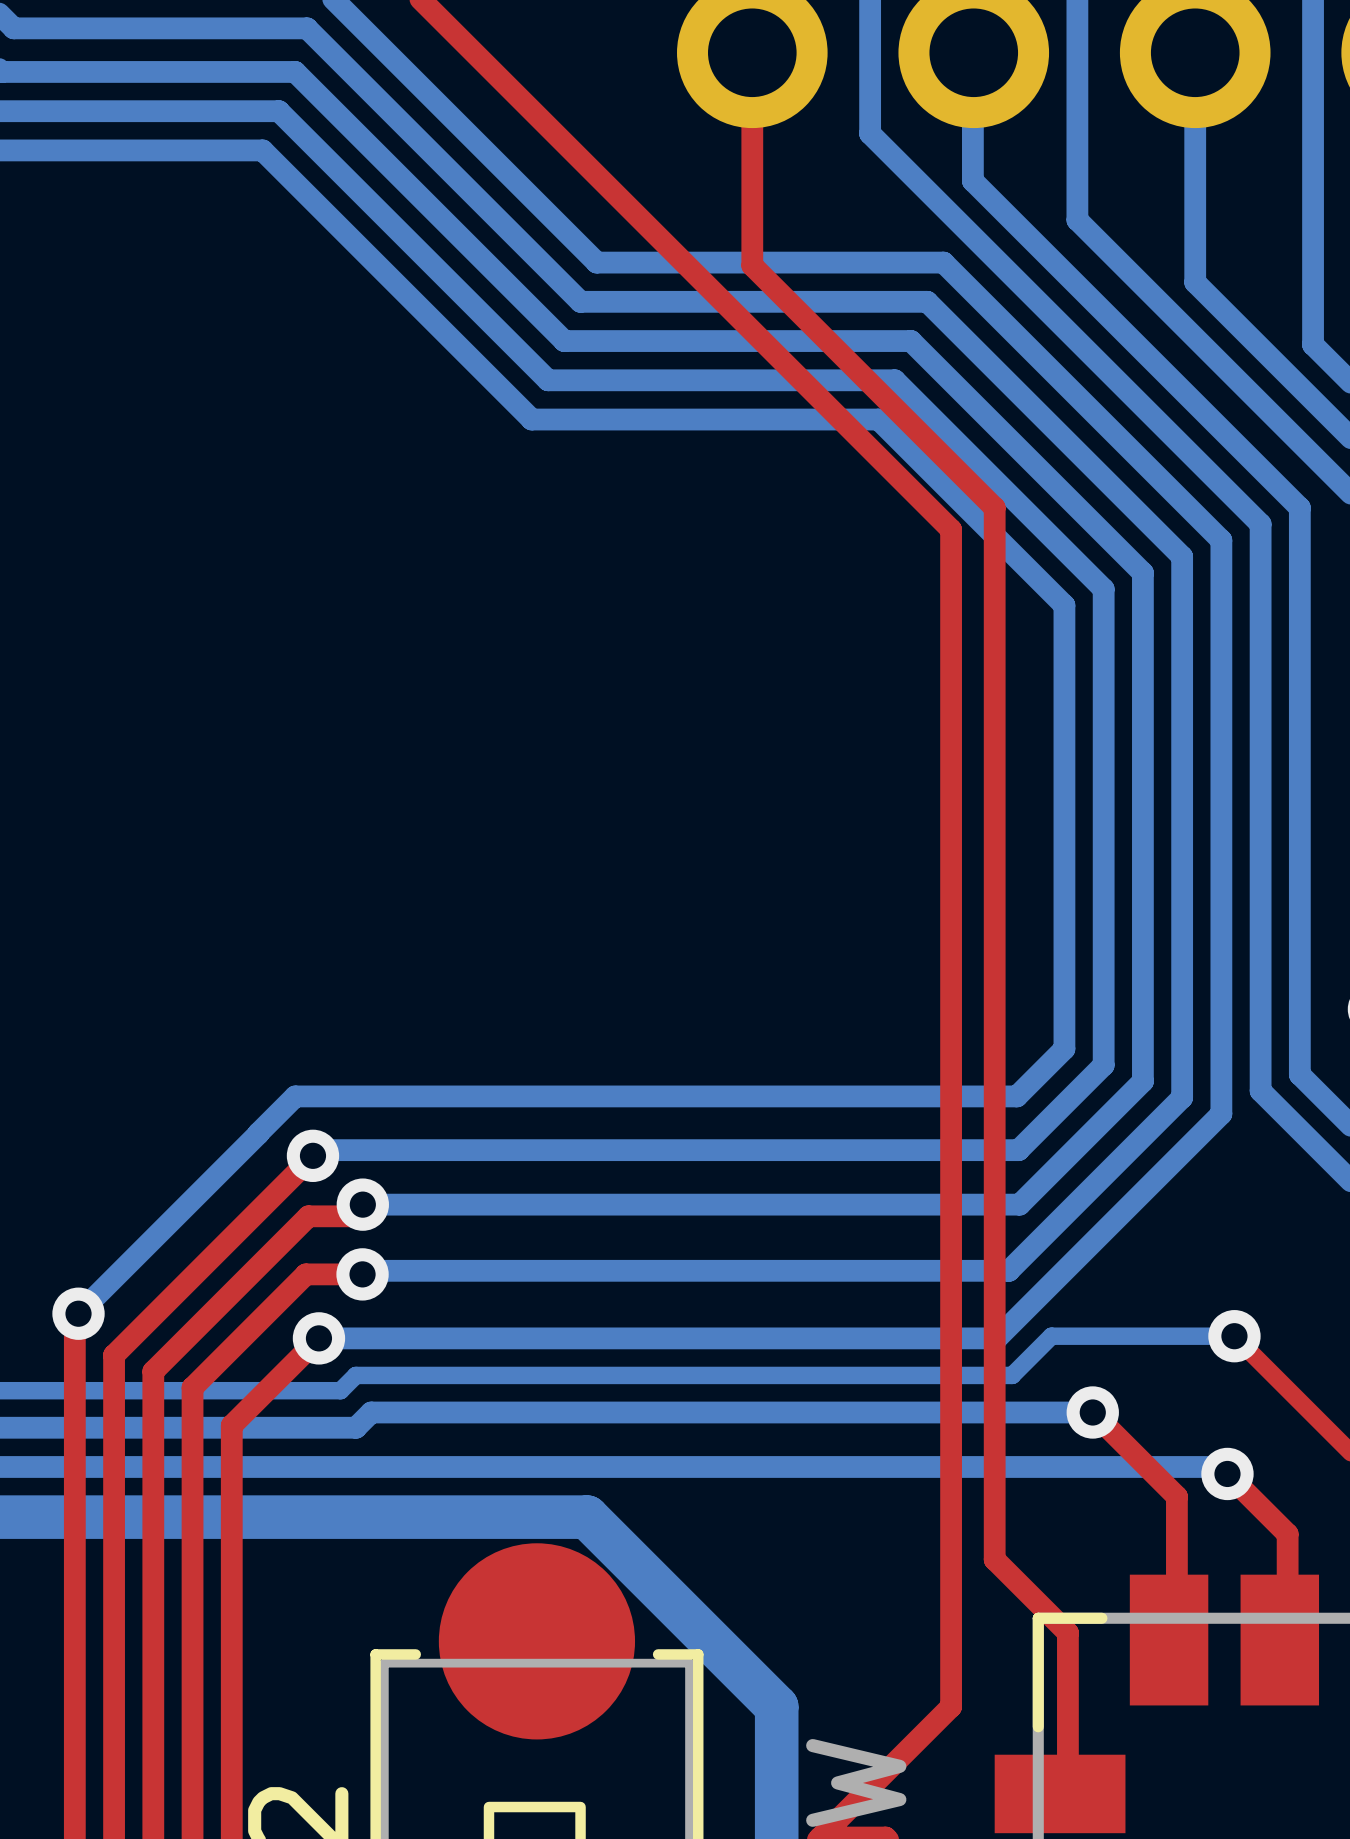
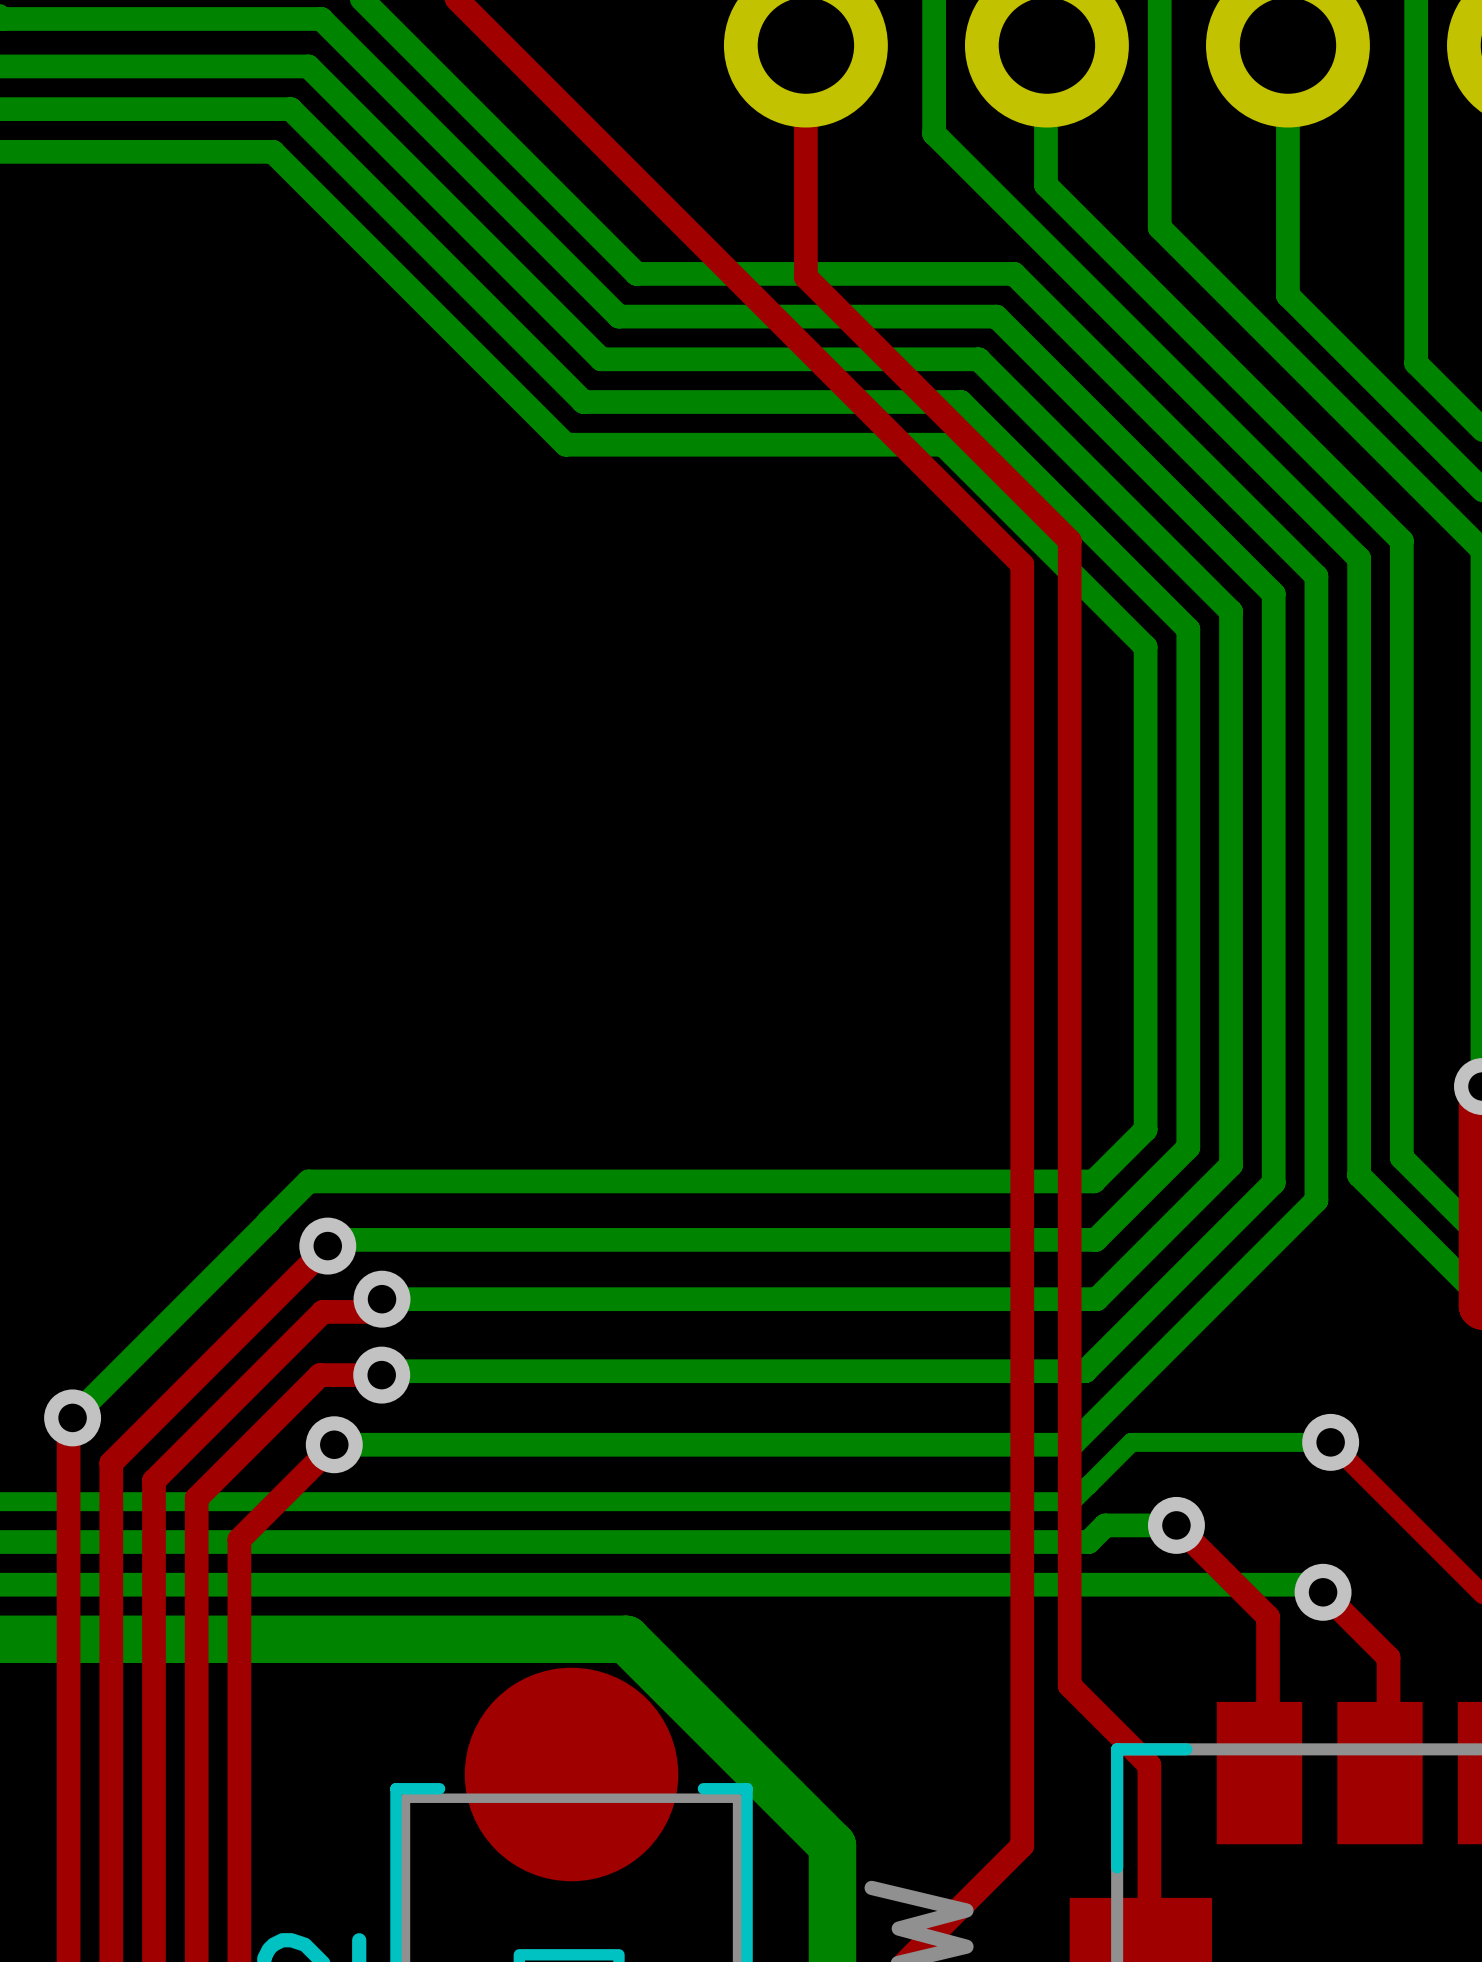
bottom track: (1012, 1375) (355, 1375) (340, 1390) -> (1088, 1485) (1071, 1501) (357, 1501)
bottom track: (1027, 1412) (371, 1412) (355, 1427) -> (1105, 1525) (1088, 1542) (374, 1542)

